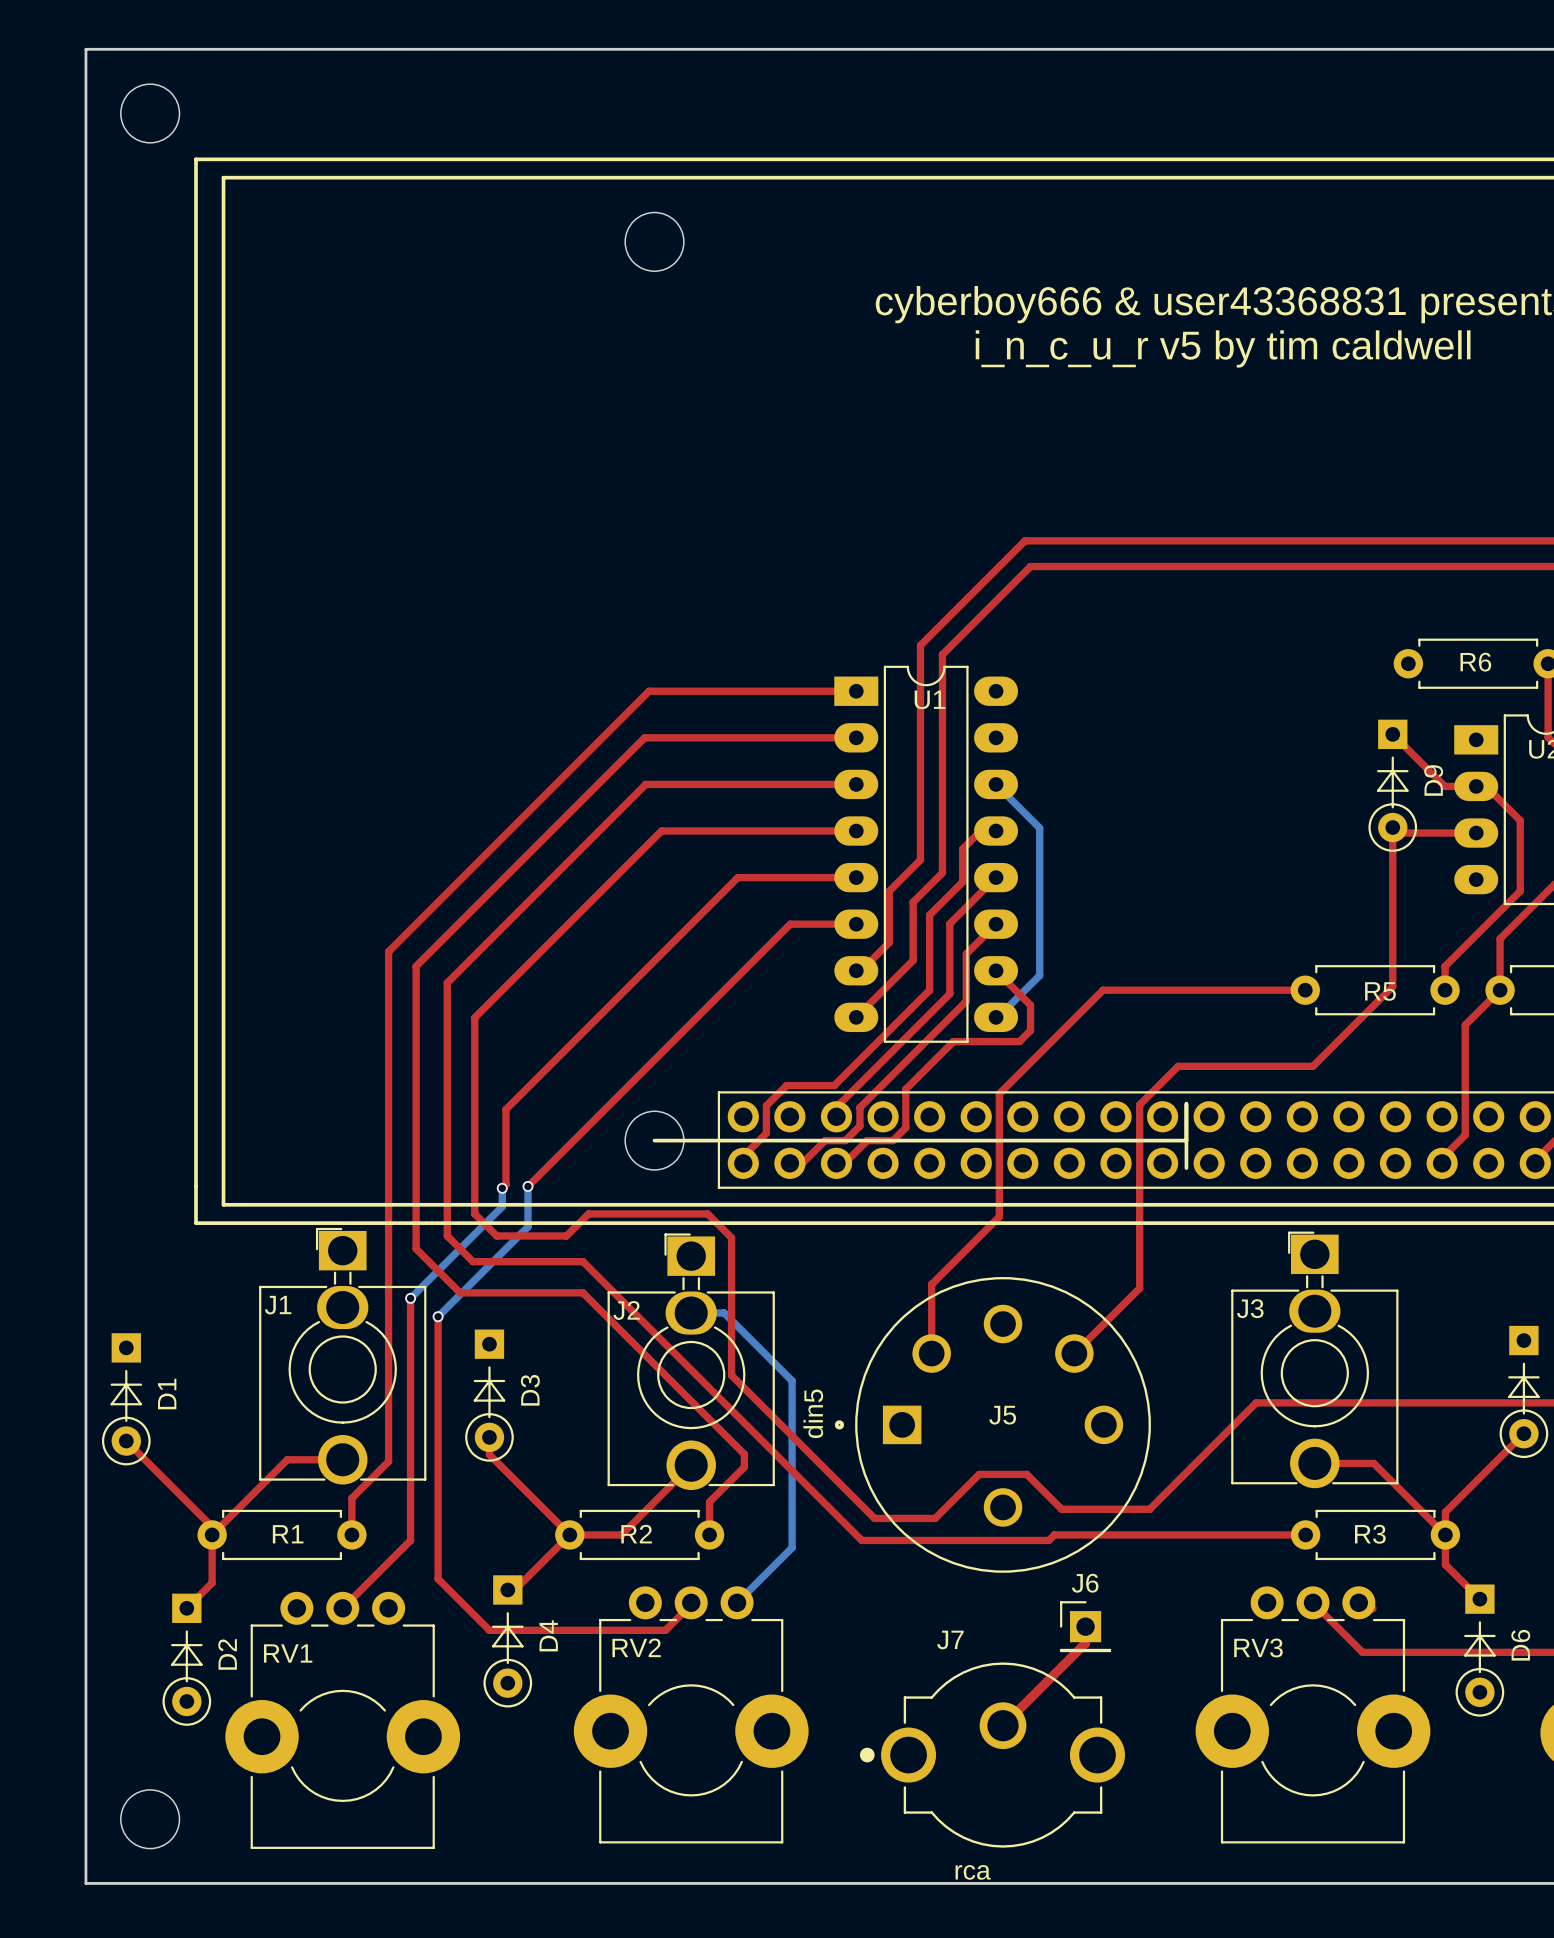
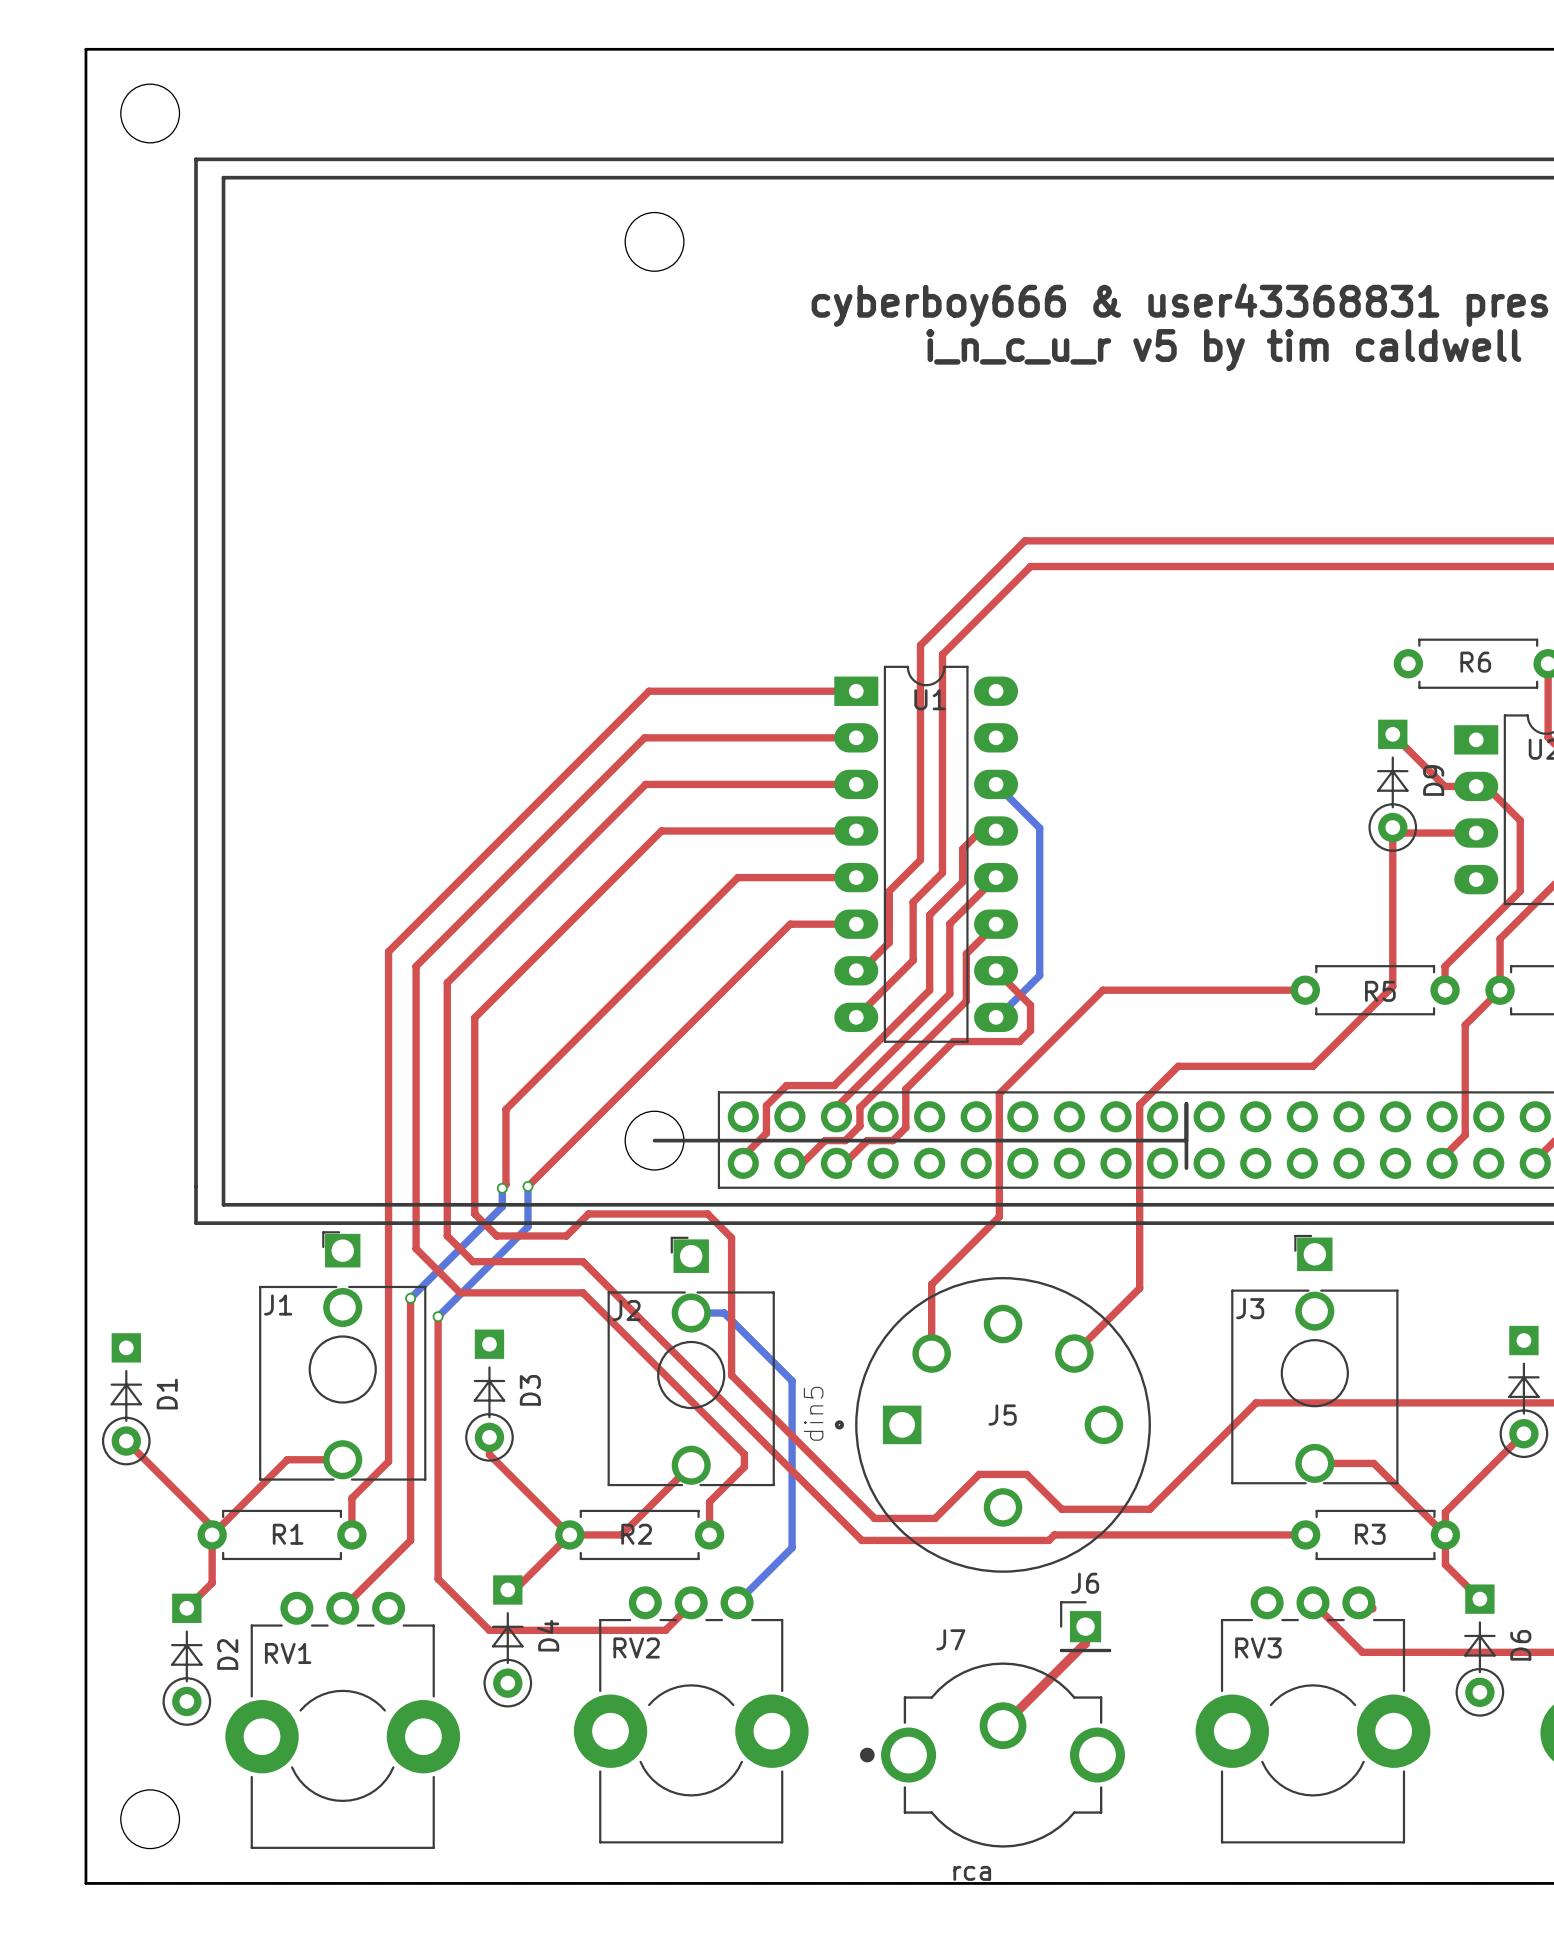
J1 footprint: [259, 1227, 427, 1485] -> [259, 1231, 427, 1481]
J3 footprint: [1231, 1231, 1399, 1489] -> [1231, 1234, 1399, 1485]
J2 footprint: [607, 1233, 775, 1491] -> [607, 1236, 775, 1487]

